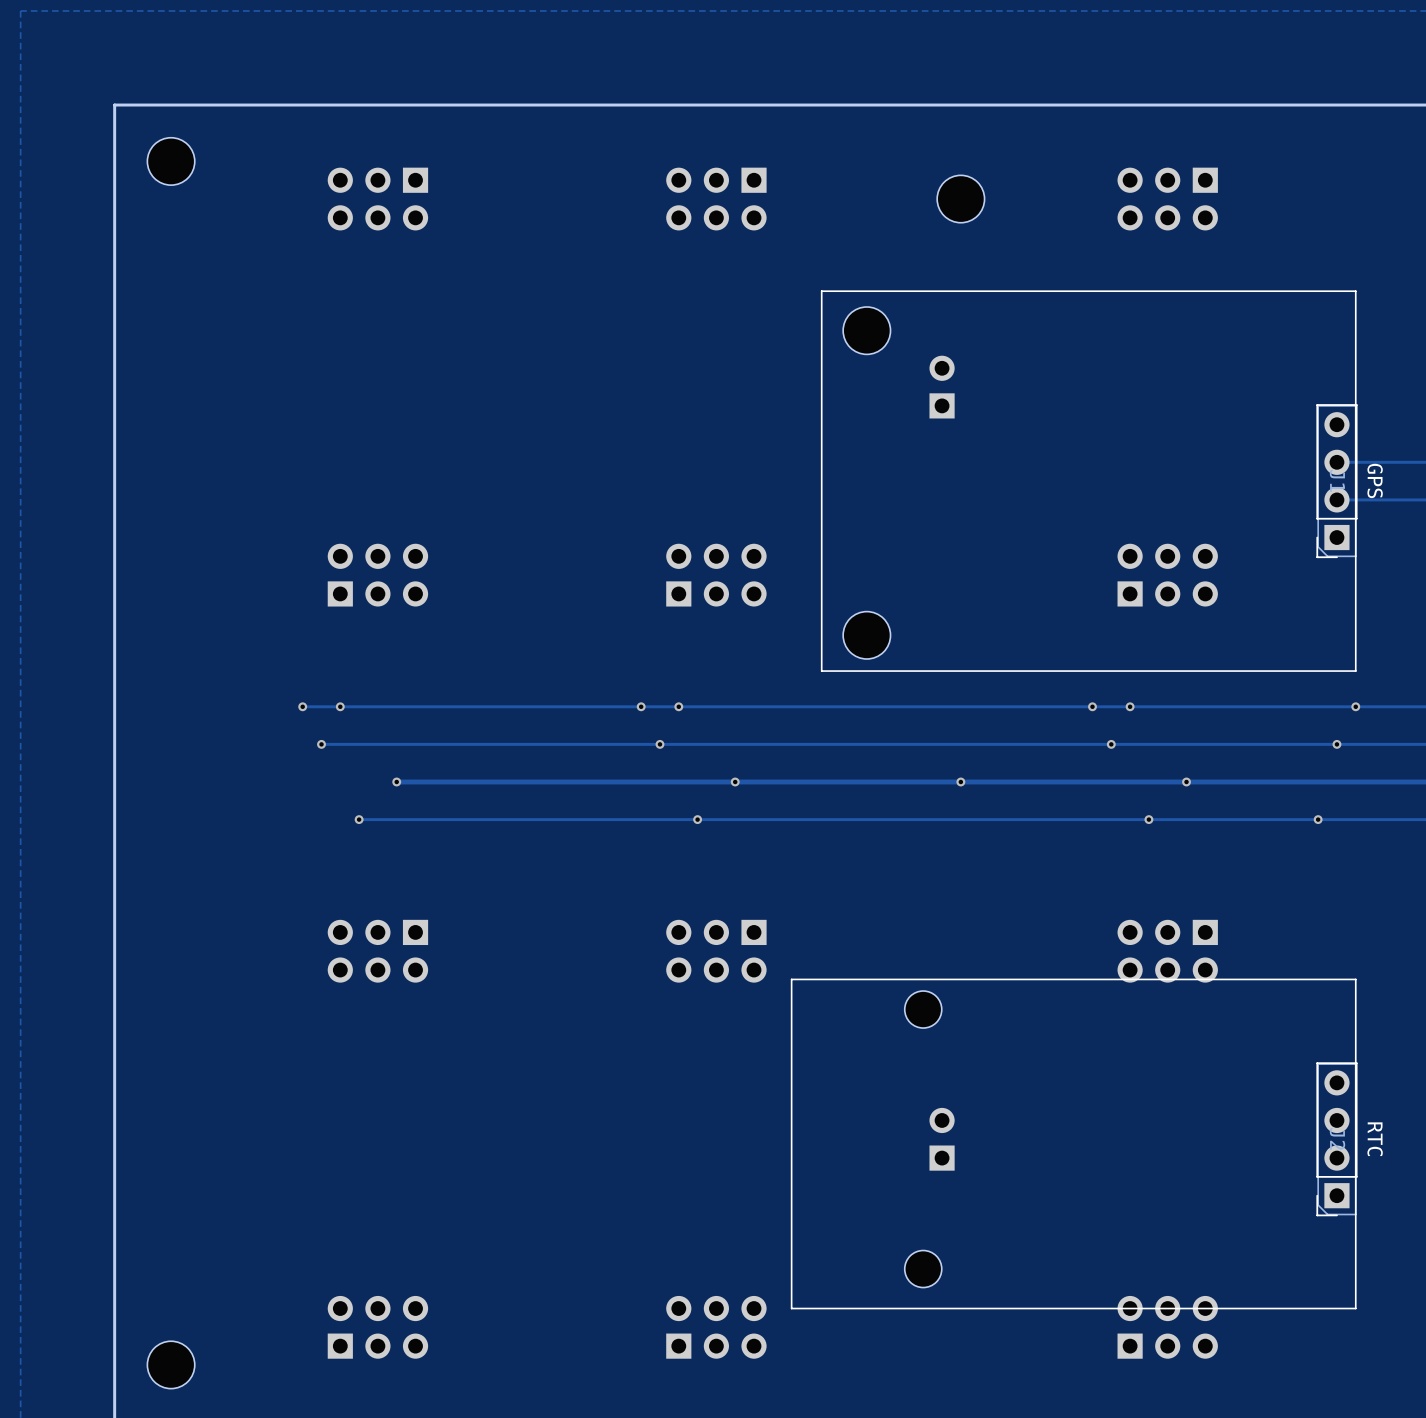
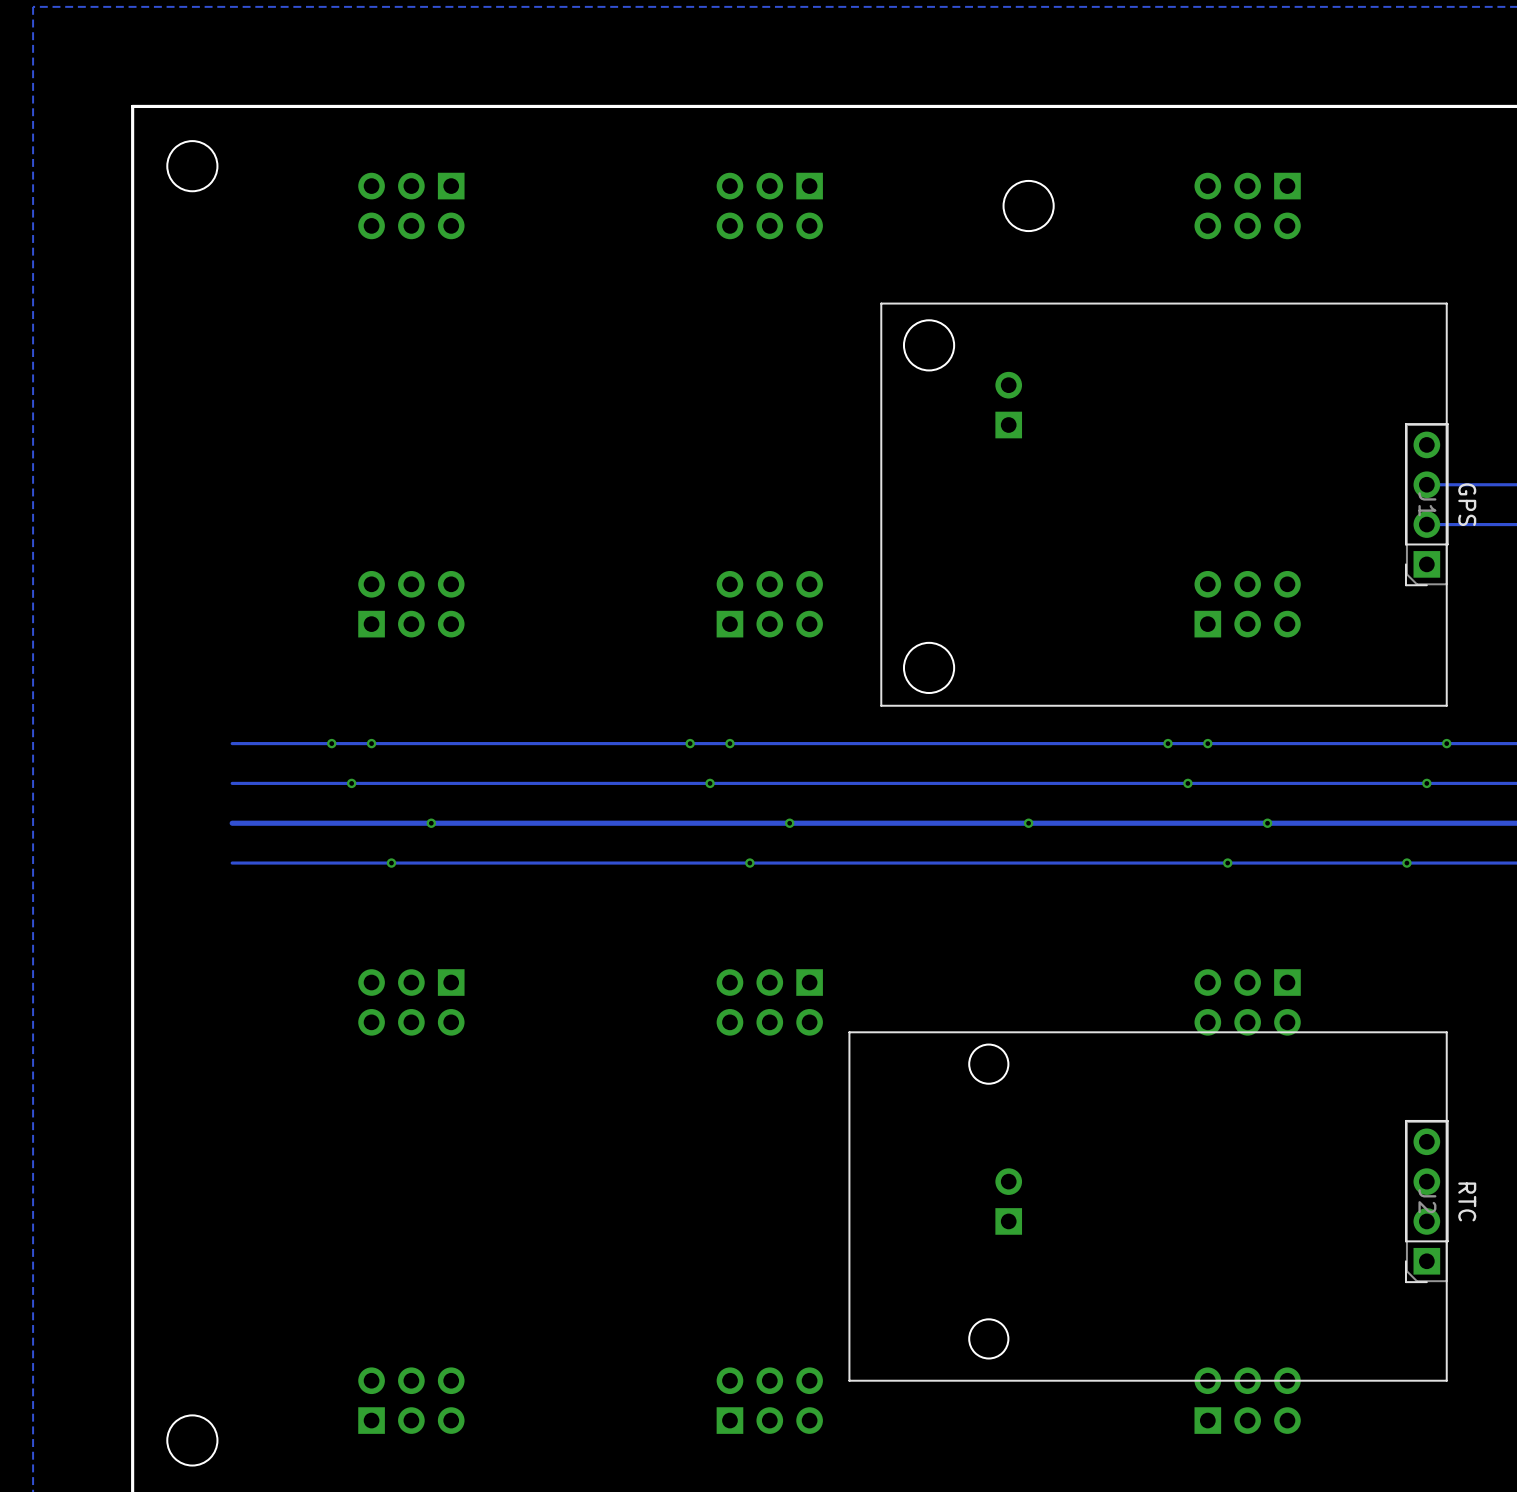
track: none -> (331, 743) (232, 743)
track: none -> (351, 783) (232, 783)
track: none -> (431, 823) (232, 823)
track: none -> (391, 863) (232, 863)

